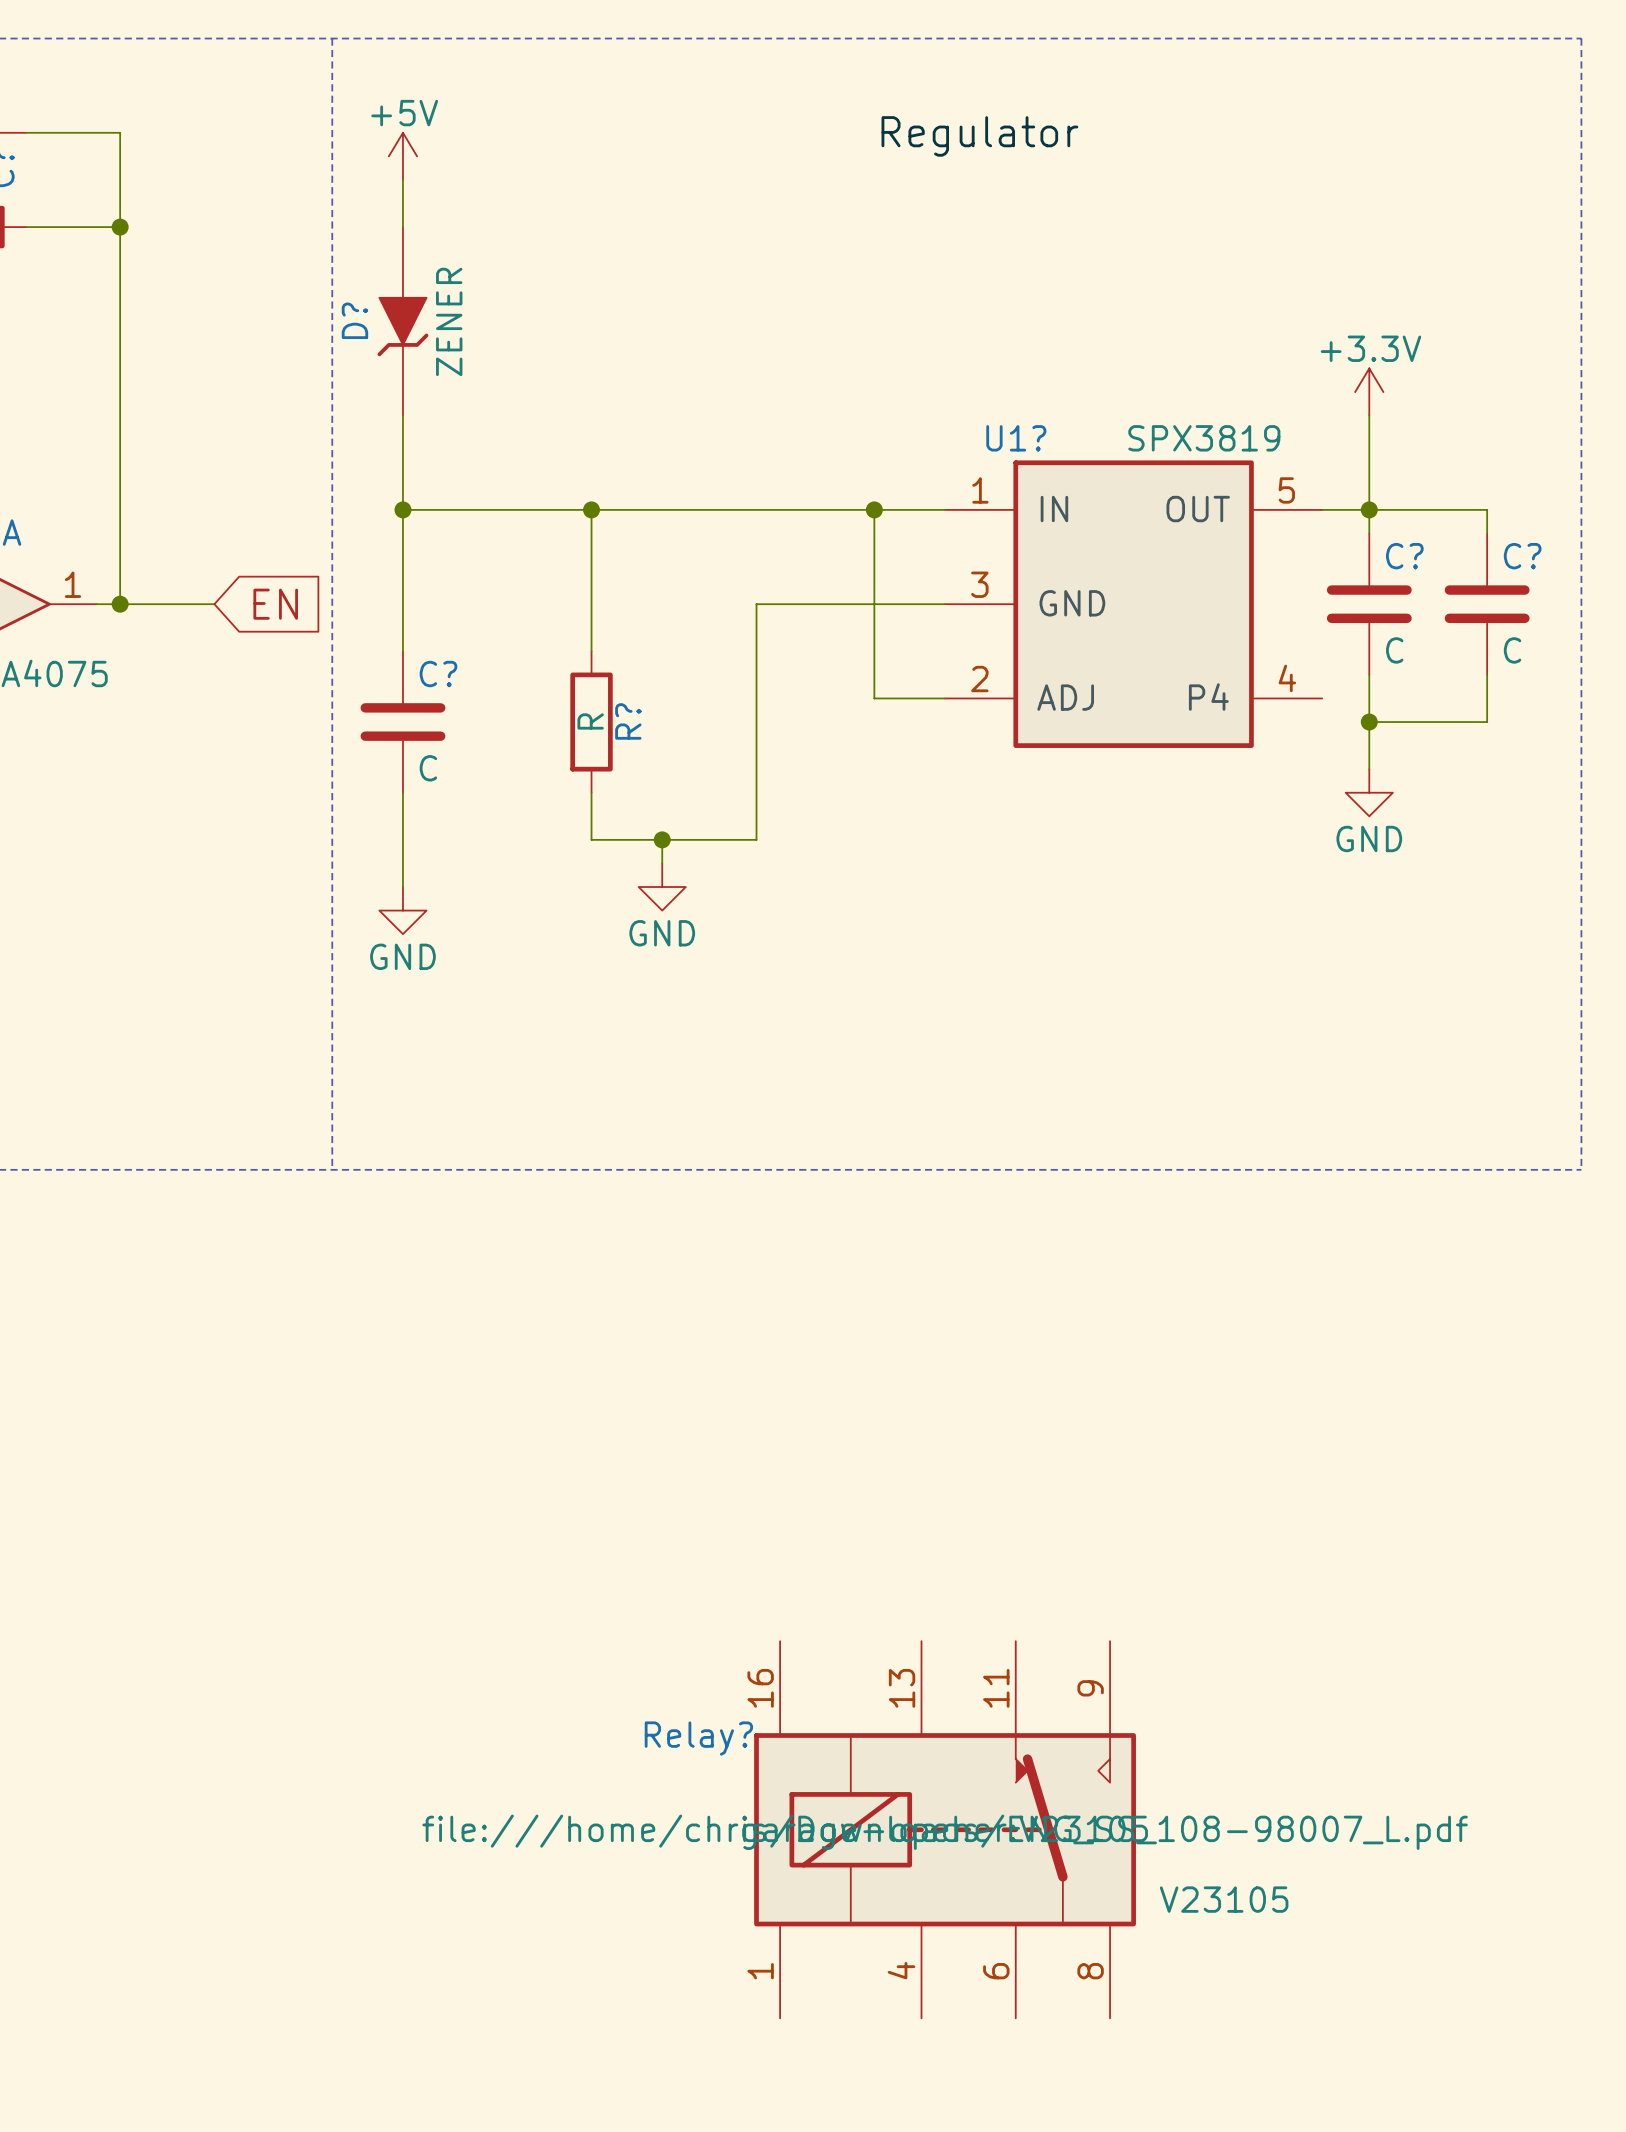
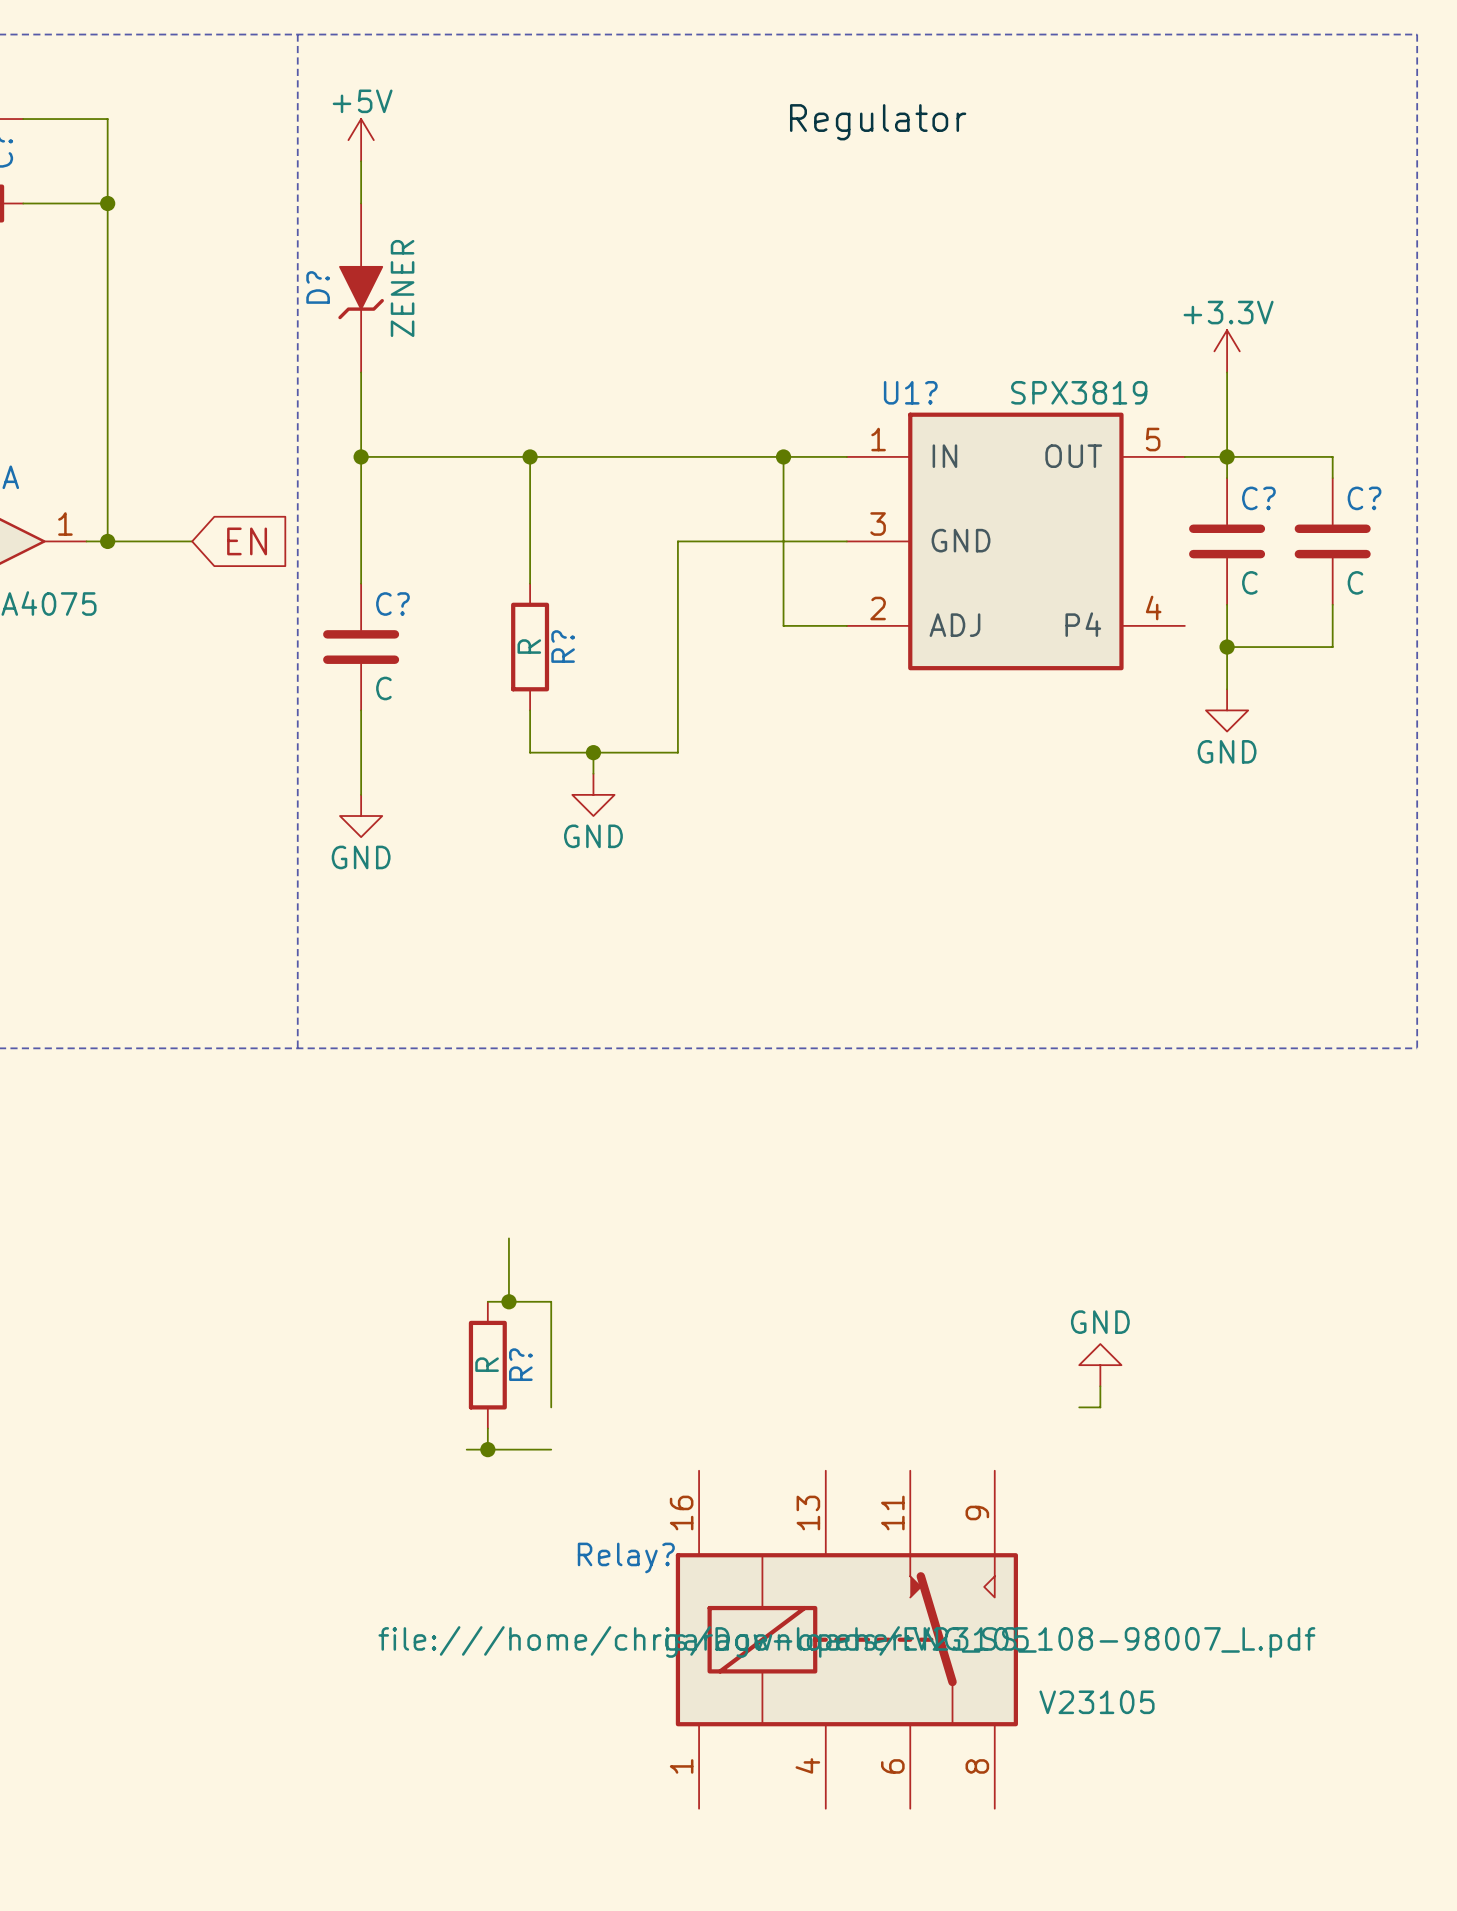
wire: none -> (508, 1238) (508, 1301)
wire: none -> (487, 1301) (551, 1301) (551, 1407)
junction: none -> (508, 1301)
R?: none -> R (487, 1365)
power symbol: none -> GND (1100, 1365)
wire: none -> (1100, 1386) (1100, 1407) (1079, 1407)
wire: none -> (487, 1428) (487, 1449)
wire: none -> (466, 1449) (551, 1449)
junction: none -> (487, 1449)

